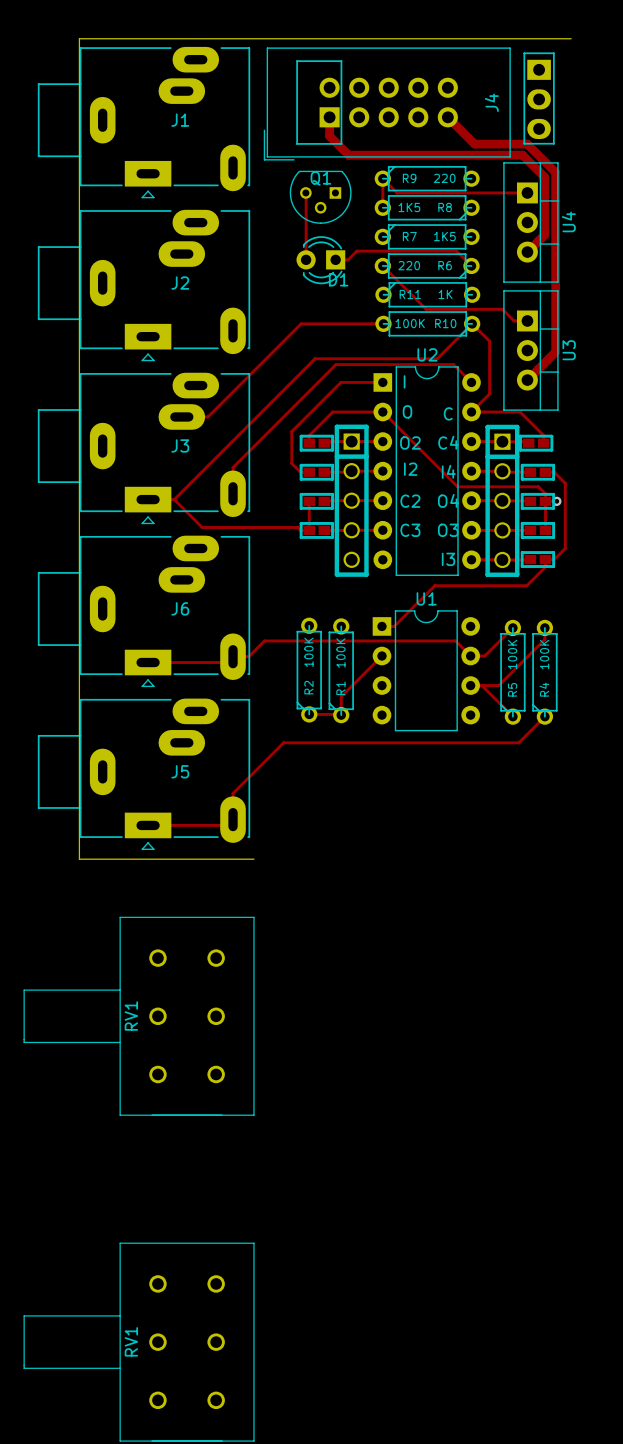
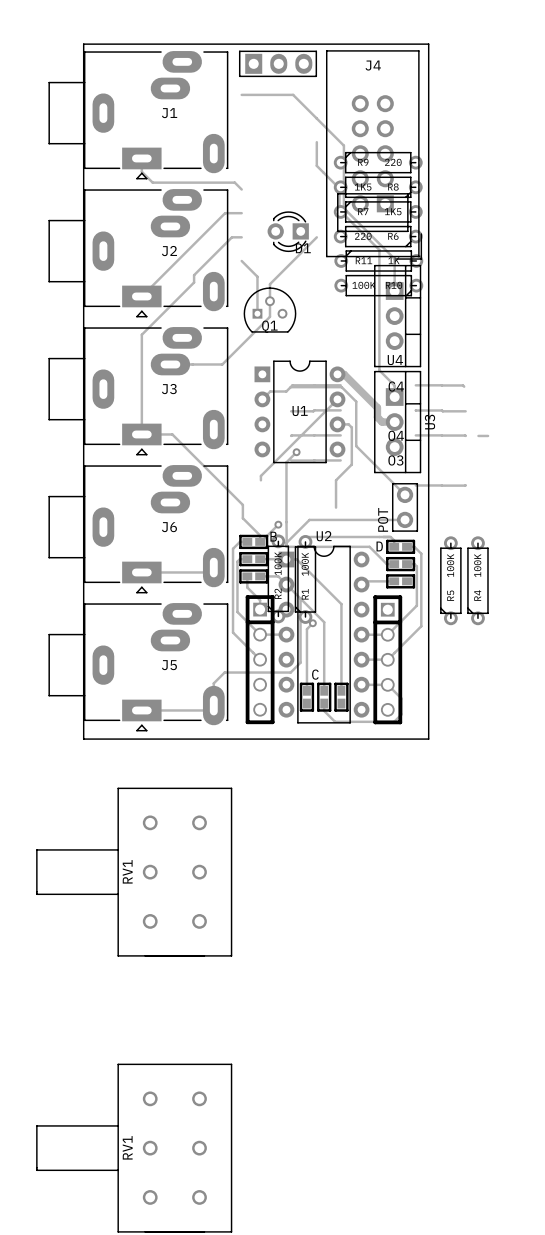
board edge: (486, 38) (571, 38) -> (428, 44) (428, 739) (231, 739)
track: none -> (241, 94) (293, 94) (343, 145) (343, 208) (394, 259) (394, 291)
part rotation: 0° (539, 98) -> 90° counterclockwise (278, 63)
part position: (539, 98) -> (278, 63)
J4 rotation: 0° (387, 103) -> 90° counterclockwise (374, 154)
track: (329, 117) (329, 136) (348, 155) (522, 155) (544, 177) (544, 234) (527, 252) -> none
track: (447, 117) (474, 144) (527, 144) (555, 172) (555, 351) (527, 380) -> none
track: none -> (316, 142) (316, 165) (339, 188) (339, 210) (379, 250) (379, 370) (394, 385) (394, 397)
track: none -> (141, 158) (141, 171) (152, 182) (234, 182) (241, 189)
track: (305, 192) (306, 259) -> none
track: (527, 192) (397, 192) (382, 178) (382, 207) -> none
Q1 rotation: 0° (320, 197) -> 180° (269, 310)
Q1 position: (320, 197) -> (269, 310)
U4 name rotation: 0° (568, 221) -> 90° clockwise (395, 360)
U4 name position: U4 (568, 221) -> U4 (395, 360)
U4 position: (530, 222) -> (397, 316)
track: none -> (241, 213) (225, 213) (141, 296)
track: (335, 259) (348, 259) (356, 251) (456, 251) (471, 265) -> none
track: (382, 265) (426, 309) (502, 309) (514, 320) (527, 320) -> none
track: none -> (241, 237) (231, 237) (194, 275) (194, 282) (141, 334) (141, 434)
track: none -> (241, 260) (257, 276) (257, 313)
track: (383, 323) (301, 323) (208, 416) -> (316, 237) (269, 284) (269, 316) (222, 364) (192, 364)
U3 position: (530, 350) -> (397, 422)
text: I (404, 381) -> none
track: (382, 382) (340, 382) (291, 431) (291, 463) (300, 472) (309, 472) -> none
track: (471, 382) (453, 364) (336, 364) (233, 467) (233, 493) -> none
text: O (407, 411) -> none
text: C (448, 413) -> none
track: none -> (337, 374) (344, 374) (377, 407) (377, 417) (382, 422) (394, 422)
track: (309, 443) (309, 435) (332, 412) (382, 412) (457, 486) (538, 486) (545, 493) (545, 530) -> none
part: (316, 443) -> none
track: none -> (290, 387) (341, 387) (356, 401) (356, 446) (405, 494)
track: none -> (291, 386) (286, 391) (270, 391) (262, 399)
text: O2 (410, 443) -> none
part: (536, 443) -> none
track: (543, 443) (543, 435) (520, 412) (471, 412) (489, 393) (489, 341) (472, 323) (437, 358) (315, 358) (174, 499) (202, 527) (297, 527) (300, 530) (309, 530) (309, 501) -> none
track: none -> (337, 399) (260, 475) (260, 480)
text: I2 (410, 469) -> none
U2 position: (427, 471) -> (324, 634)
text: I4 (448, 471) -> none
part: (316, 472) -> none
part: (537, 472) -> none
track: (545, 472) (554, 472) (565, 483) (565, 548) (554, 559) (545, 559) (545, 567) (526, 585) (434, 585) (394, 626) (381, 626) -> none
track: none -> (337, 424) (348, 424) (351, 427) (351, 464) (336, 480) (336, 507)
track: none -> (164, 434) (172, 434) (242, 504) (242, 518) (260, 535) (260, 541) (278, 524)
part: (351, 500) -> none
part: (502, 500) -> none
part: (316, 501) -> none
text: C2 (410, 501) -> none
part: (537, 501) -> none
via: (556, 501) -> none
track: none -> (296, 452) (286, 462) (286, 546)
via: none -> (296, 452)
part: (316, 530) -> none
text: C3 (410, 530) -> none
part: (537, 530) -> none
text: I3 (448, 559) -> none
part: (537, 559) -> none
POT: none -> (405, 507)
U1 name position: U1 (426, 598) -> U1 (300, 411)
track: none -> (405, 519) (309, 519) (286, 542) (286, 546)
via: none -> (278, 524)
text: none -> B (273, 536)
track: none -> (303, 536) (390, 536) (394, 540) (394, 546)
track: none -> (247, 541) (239, 541) (233, 548) (233, 632) (260, 659)
part: none -> (253, 541)
track: (512, 627) (484, 656) (470, 656) (455, 640) (264, 640) (248, 656) (233, 656) -> none
track: (544, 627) (544, 639) (498, 685) (470, 685) -> none
text: none -> D (379, 546)
track: none -> (286, 546) (369, 546) (386, 564) (394, 564)
part: none -> (400, 546)
track: none -> (407, 546) (414, 546) (421, 553) (421, 626) (387, 659) (361, 659)
track: none -> (247, 559) (239, 559) (237, 561) (237, 612) (260, 634) (286, 634)
part: none -> (253, 559)
track: none -> (260, 559) (296, 559) (341, 604) (341, 690)
part: none -> (400, 564)
track: none -> (407, 564) (414, 564) (416, 566) (416, 605) (387, 634) (361, 634)
track: (381, 656) (341, 696) (341, 715) (309, 714) -> none
track: none -> (247, 576) (247, 587) (260, 600) (260, 609)
part: none -> (253, 576)
track: none -> (260, 576) (278, 576) (324, 622) (324, 690)
U1 position: (426, 670) -> (299, 411)
track: none -> (394, 581) (364, 581) (361, 584)
part: none -> (400, 581)
track: (481, 685) (512, 716) -> none
track: (544, 716) (518, 742) (283, 742) (245, 780) -> (300, 598) (300, 662) (290, 672) (224, 672)
track: none -> (312, 623) (306, 629) (306, 690)
via: none -> (312, 623)
part: none -> (260, 659)
part: none -> (387, 659)
text: none -> C (315, 674)
track: none -> (361, 684) (387, 684) (401, 698) (401, 714) (394, 721) (335, 721) (324, 710) (324, 703)
part: none -> (306, 697)
part: none -> (324, 697)
part: none -> (341, 697)

